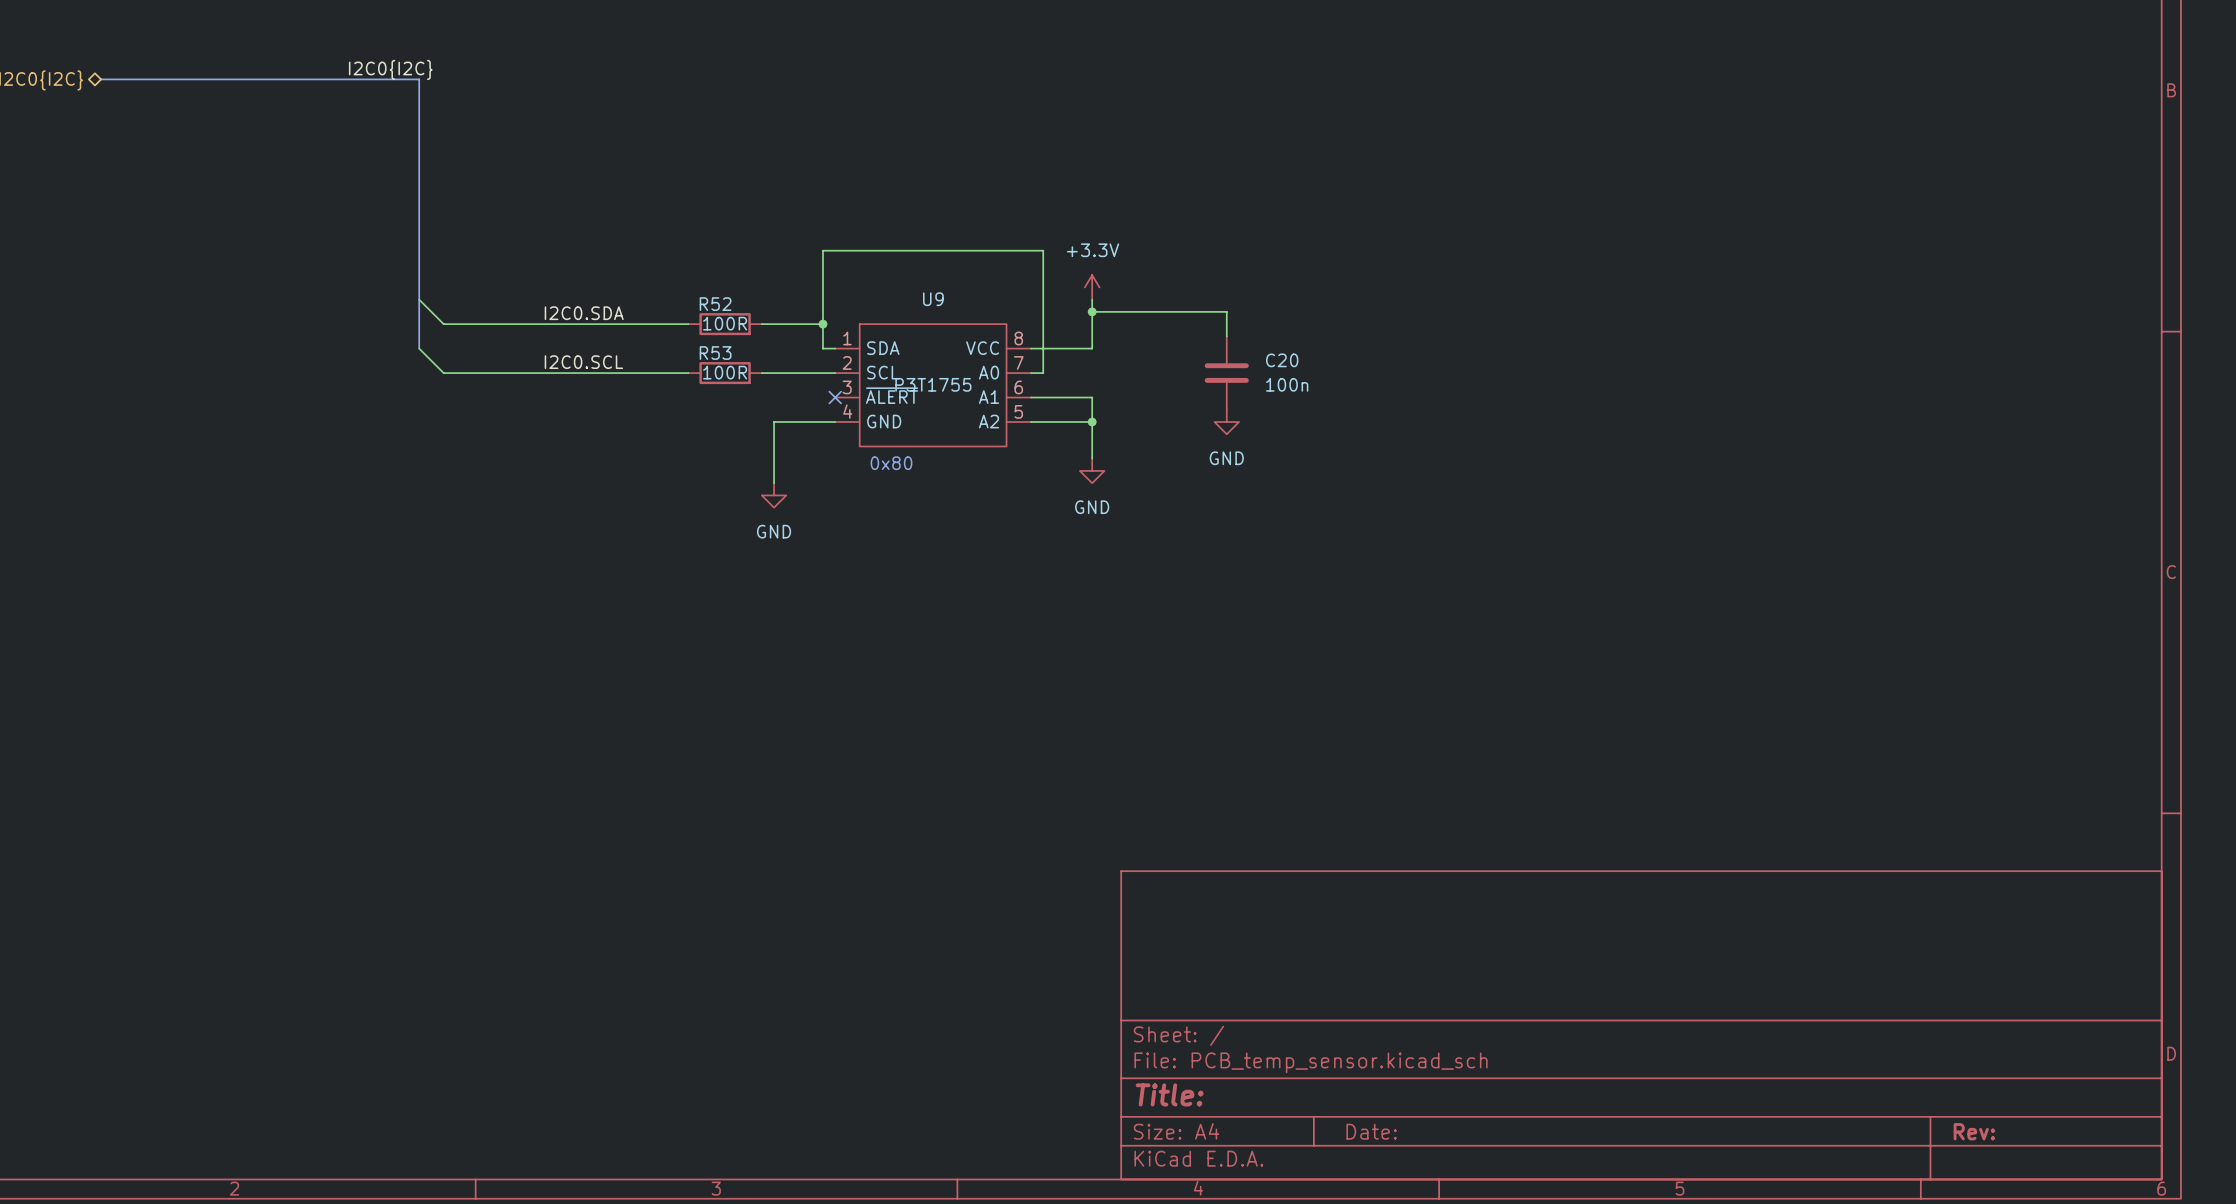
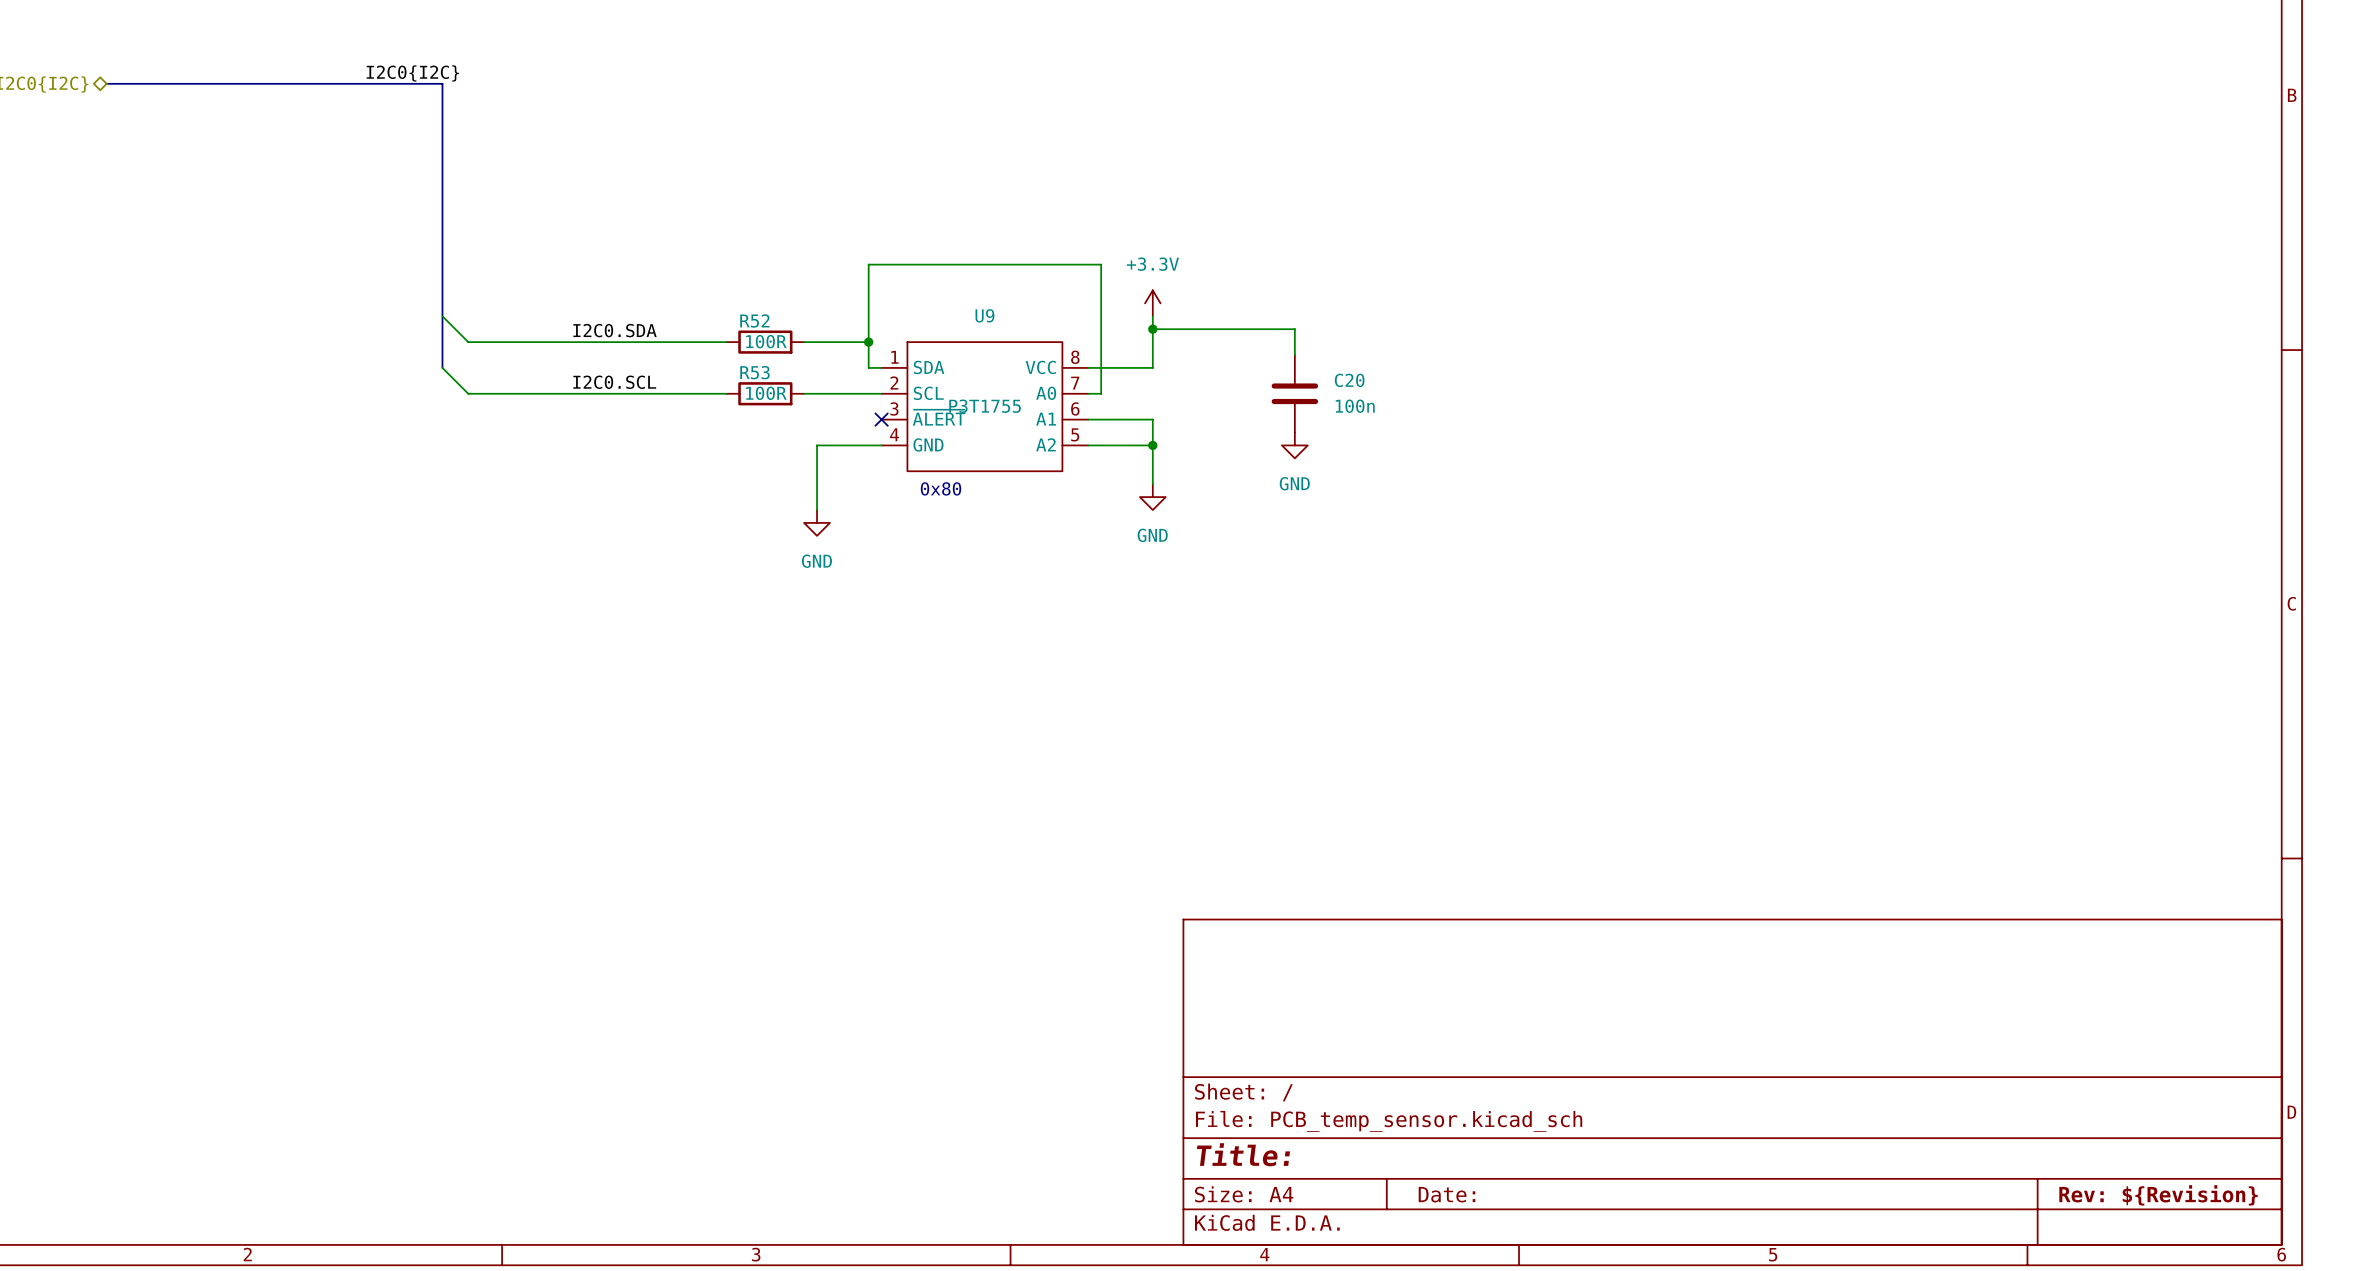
title block: Rev: (1974, 1131) -> Rev: ${Revision} (2158, 1195)

